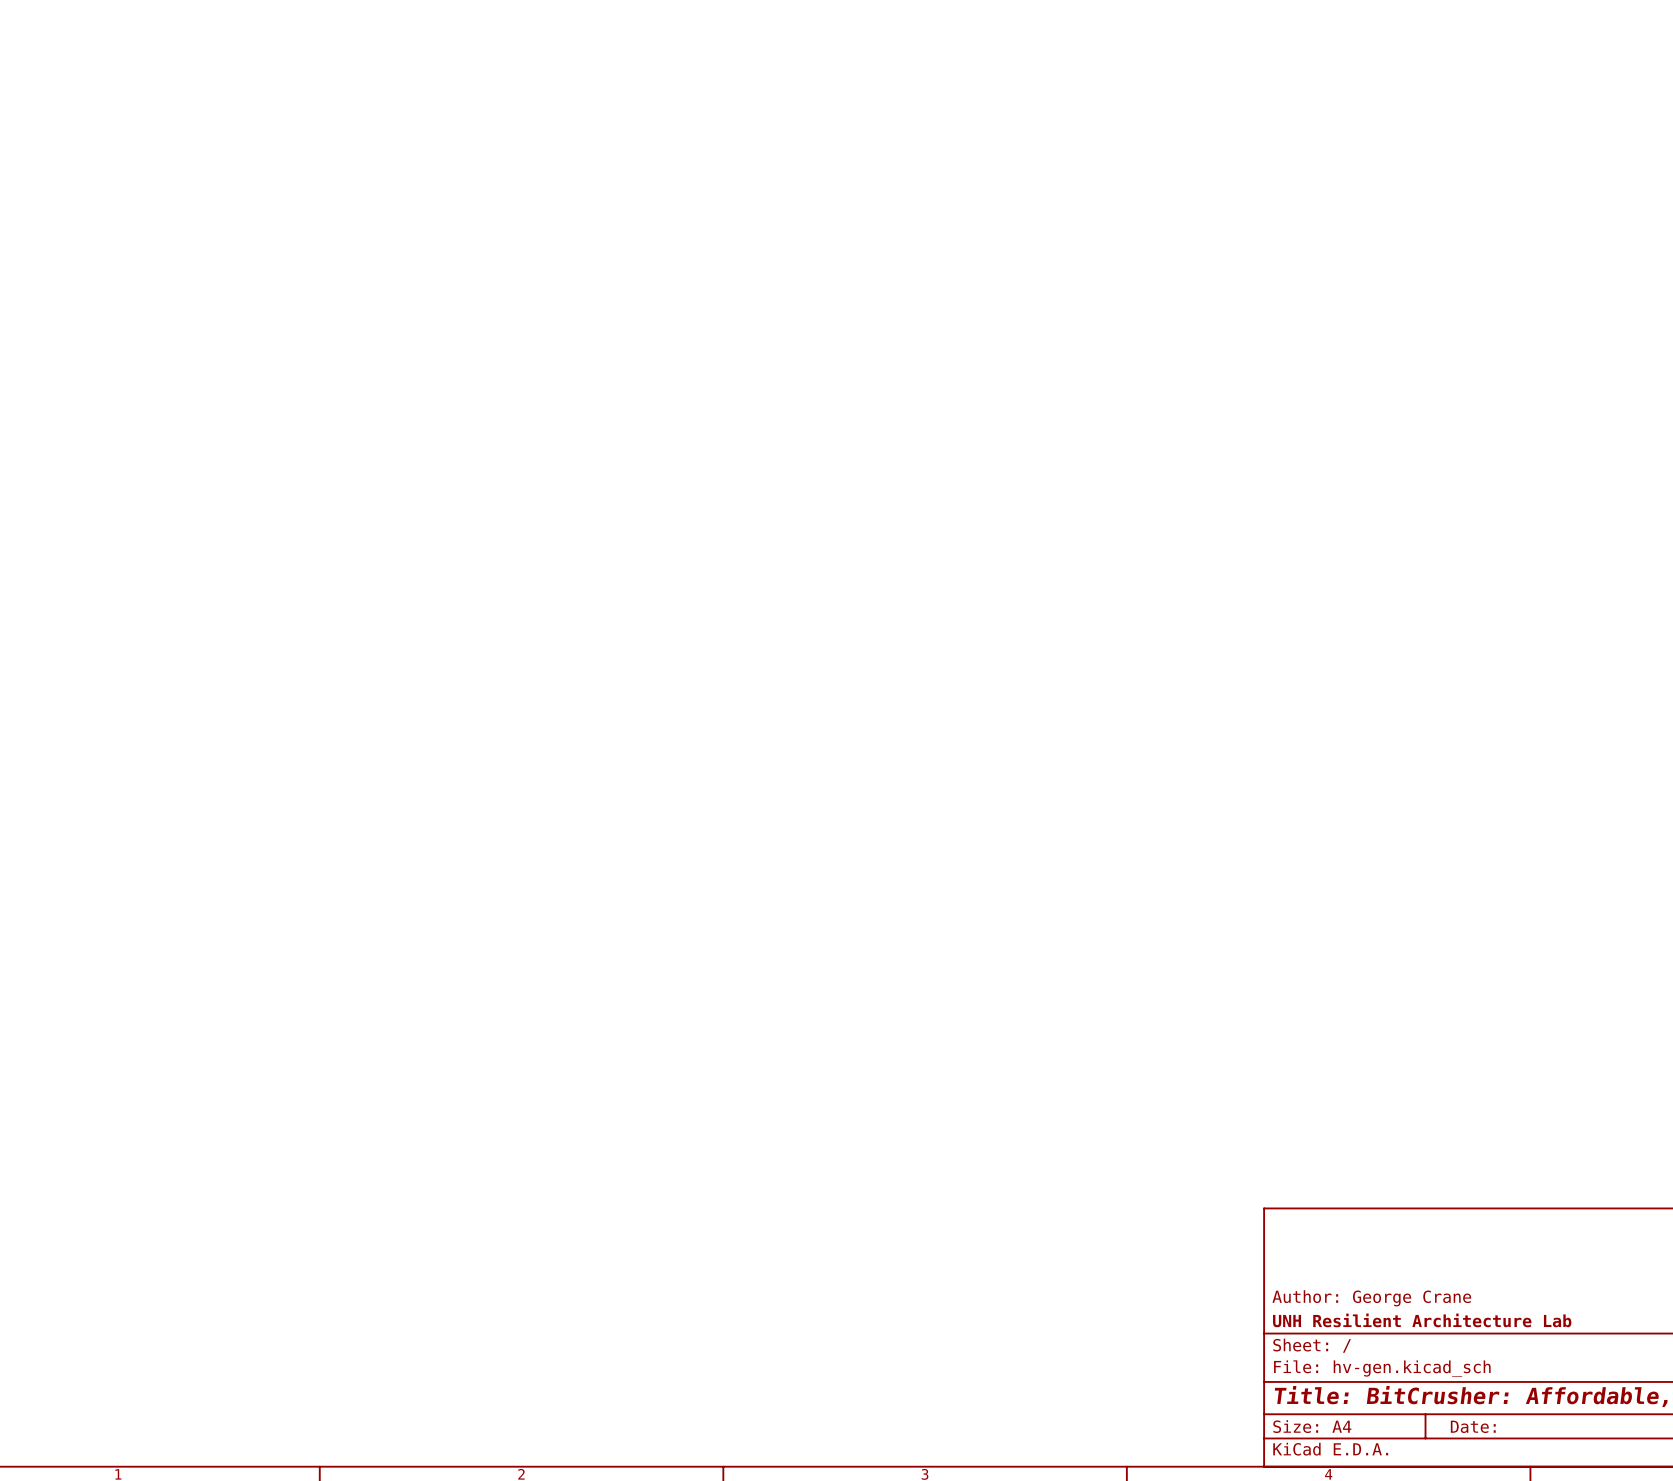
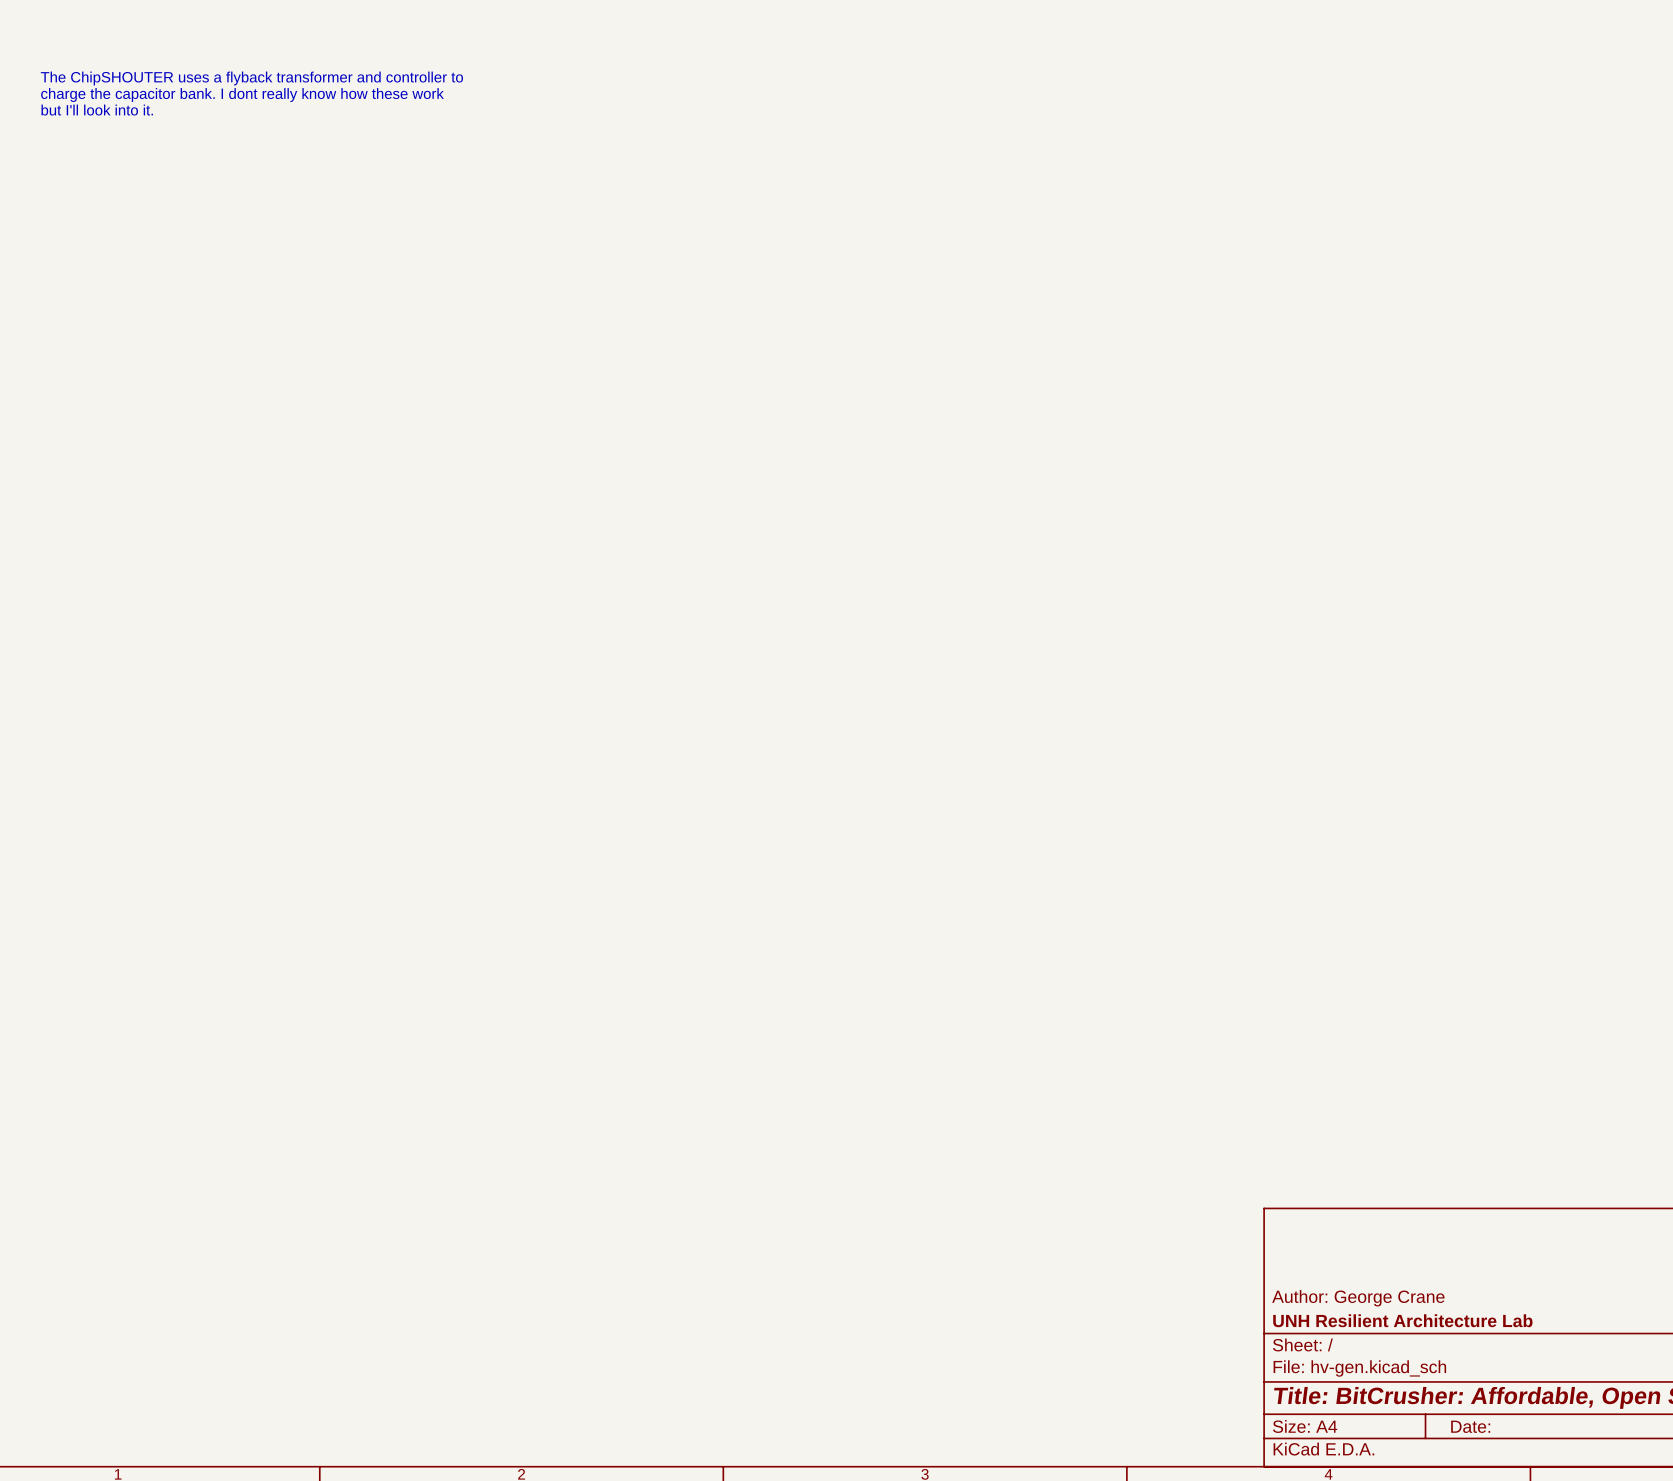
text: none -> The ChipSHOUTER uses a flyback transformer and controller to (251, 78)
text: none -> charge the capacitor bank. I dont really know how these work (242, 95)
text: none -> but I'll look into it. (97, 110)

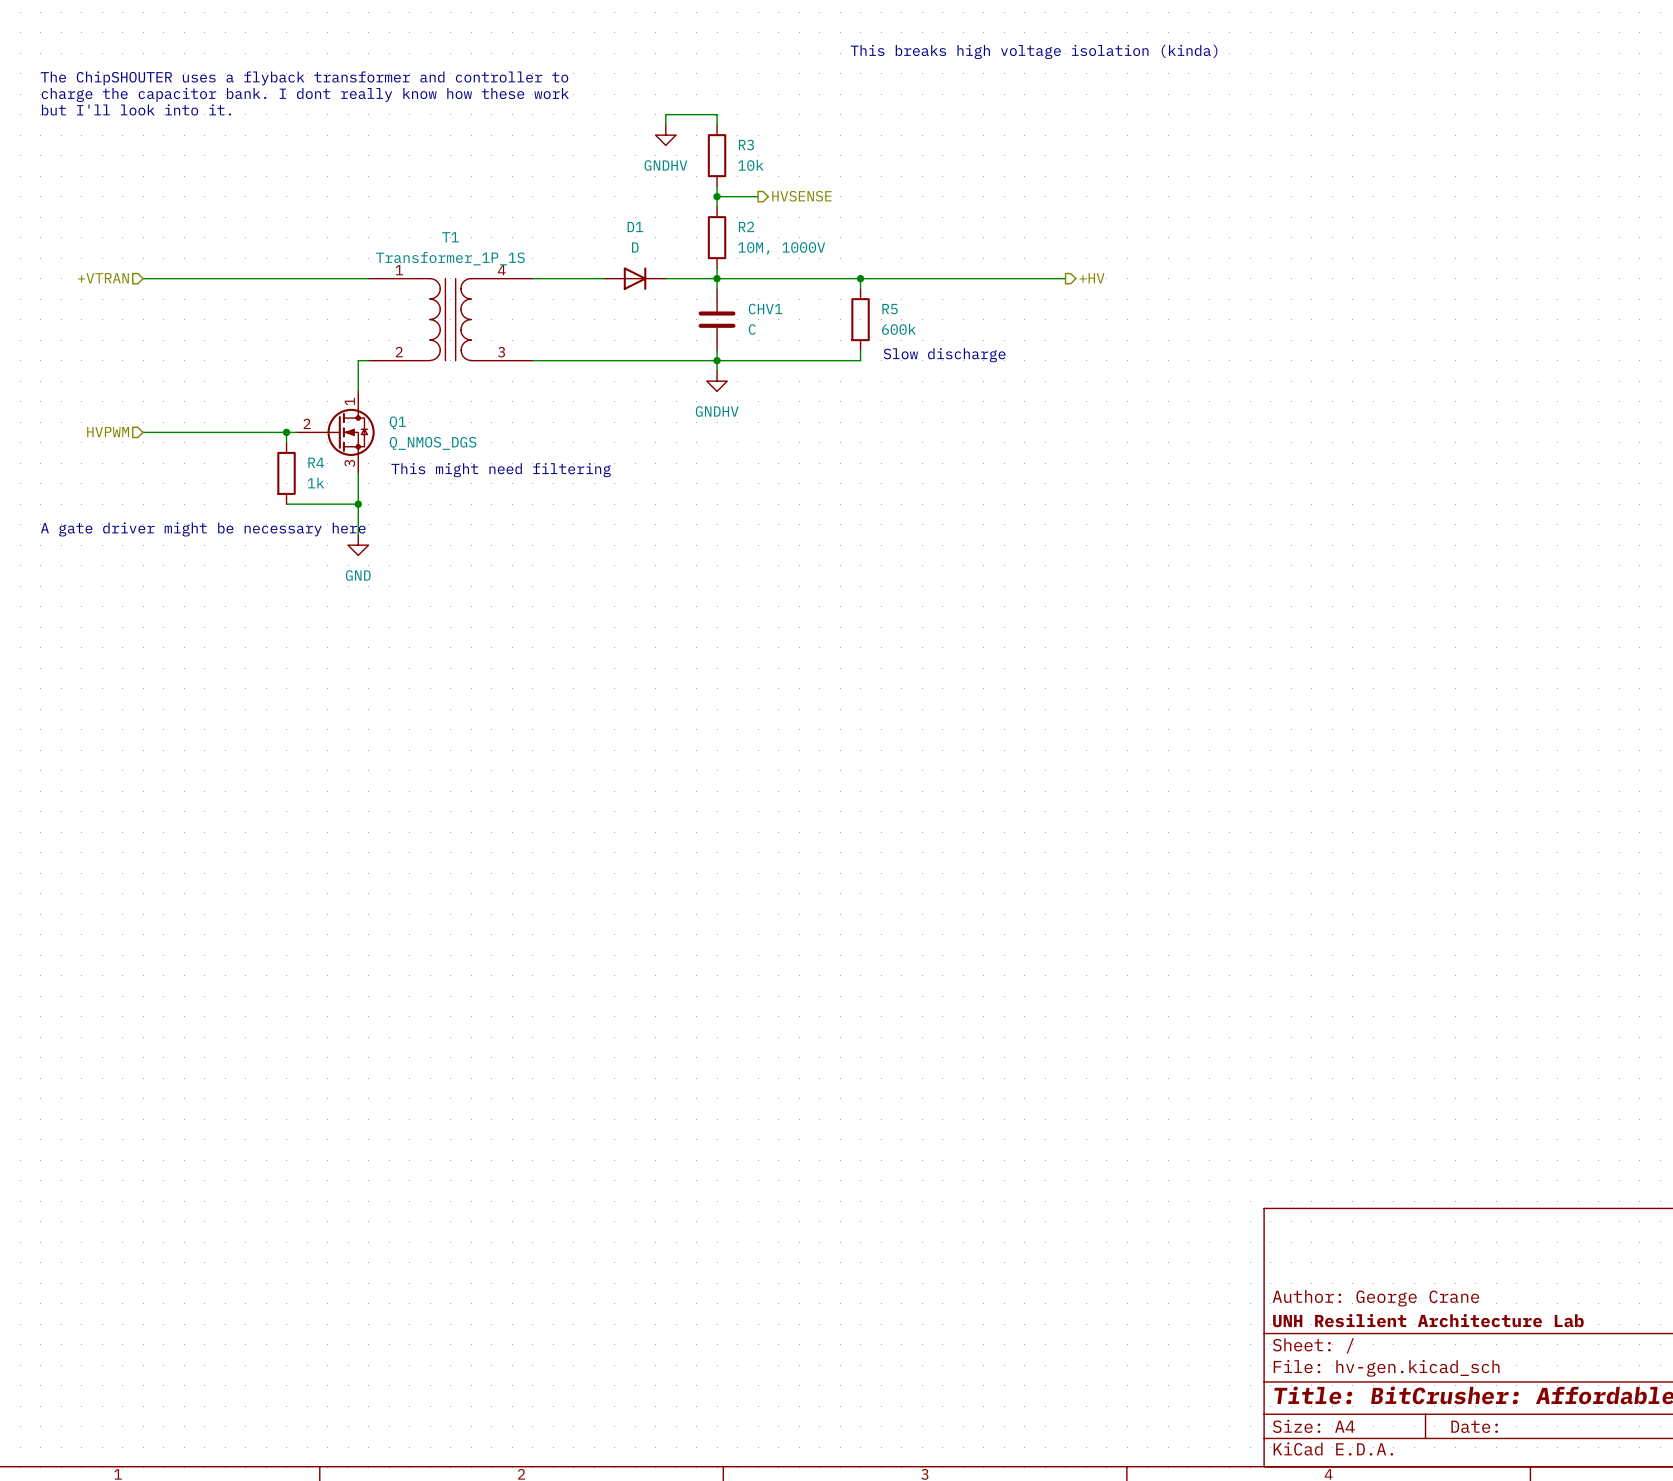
text: none -> This breaks high voltage isolation (kinda) (1034, 51)
wire: none -> (665, 124) (665, 114) (717, 114) (717, 124)
power symbol: none -> GNDHV (665, 135)
R3: none -> 10k (717, 155)
wire: none -> (717, 186) (717, 206)
wire: none -> (717, 196) (758, 196)
junction: none -> (717, 196)
hierarchical label: none -> HVSENSE (801, 196)
R2: none -> 10M, 1000V (717, 237)
wire: none -> (717, 268) (717, 288)
hierarchical label: none -> +VTRAN (103, 278)
wire: none -> (143, 278) (368, 278)
wire: none -> (532, 278) (604, 278)
D1: none -> D (635, 278)
wire: none -> (665, 278) (1065, 278)
junction: none -> (717, 278)
wire: none -> (860, 278) (860, 288)
junction: none -> (860, 278)
hierarchical label: none -> +HV (1091, 278)
T1: none -> Transformer_1P_1S (450, 319)
CHV1: none -> C (717, 319)
R5: none -> 600k (860, 319)
wire: none -> (717, 350) (717, 370)
wire: none -> (860, 350) (860, 360) (532, 360)
text: none -> Slow discharge (944, 355)
wire: none -> (368, 360) (358, 360) (358, 391)
junction: none -> (717, 360)
power symbol: none -> GNDHV (717, 381)
hierarchical label: none -> HVPWM (108, 432)
wire: none -> (143, 432) (296, 432)
wire: none -> (286, 432) (286, 442)
junction: none -> (286, 432)
Q1: none -> Q_NMOS_DGS (335, 432)
text: none -> This might need filtering (501, 470)
R4: none -> 1k (286, 473)
wire: none -> (358, 473) (358, 534)
wire: none -> (286, 504) (358, 504)
junction: none -> (358, 504)
text: none -> A gate driver might be necessary here (203, 529)
power symbol: none -> GND (358, 545)

